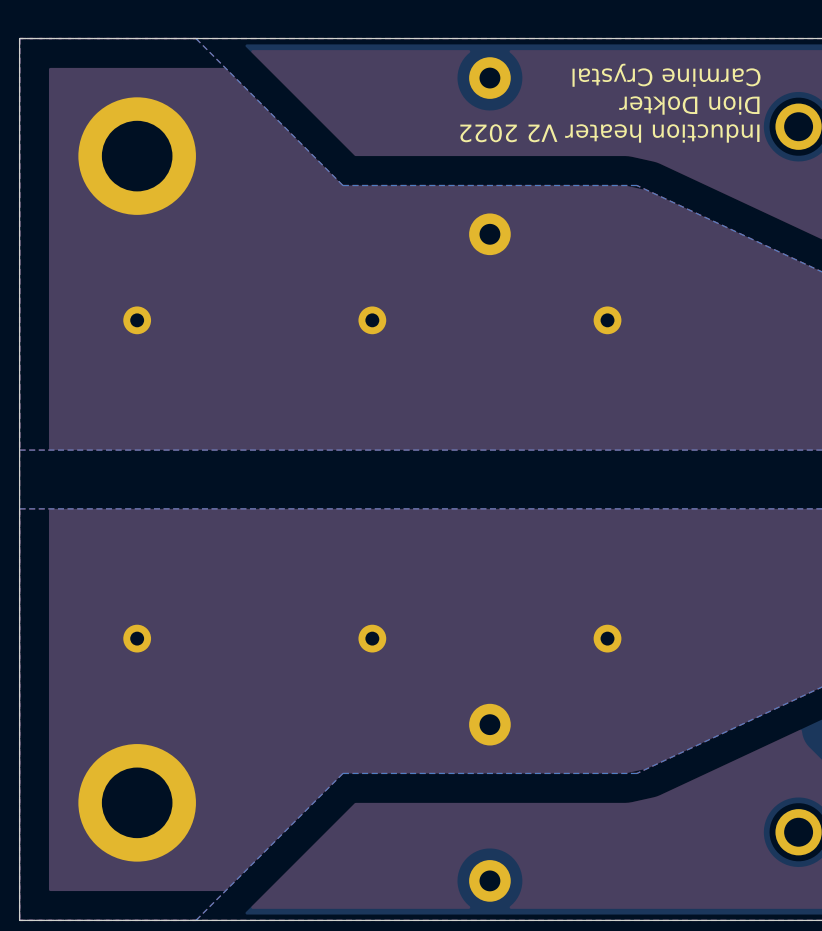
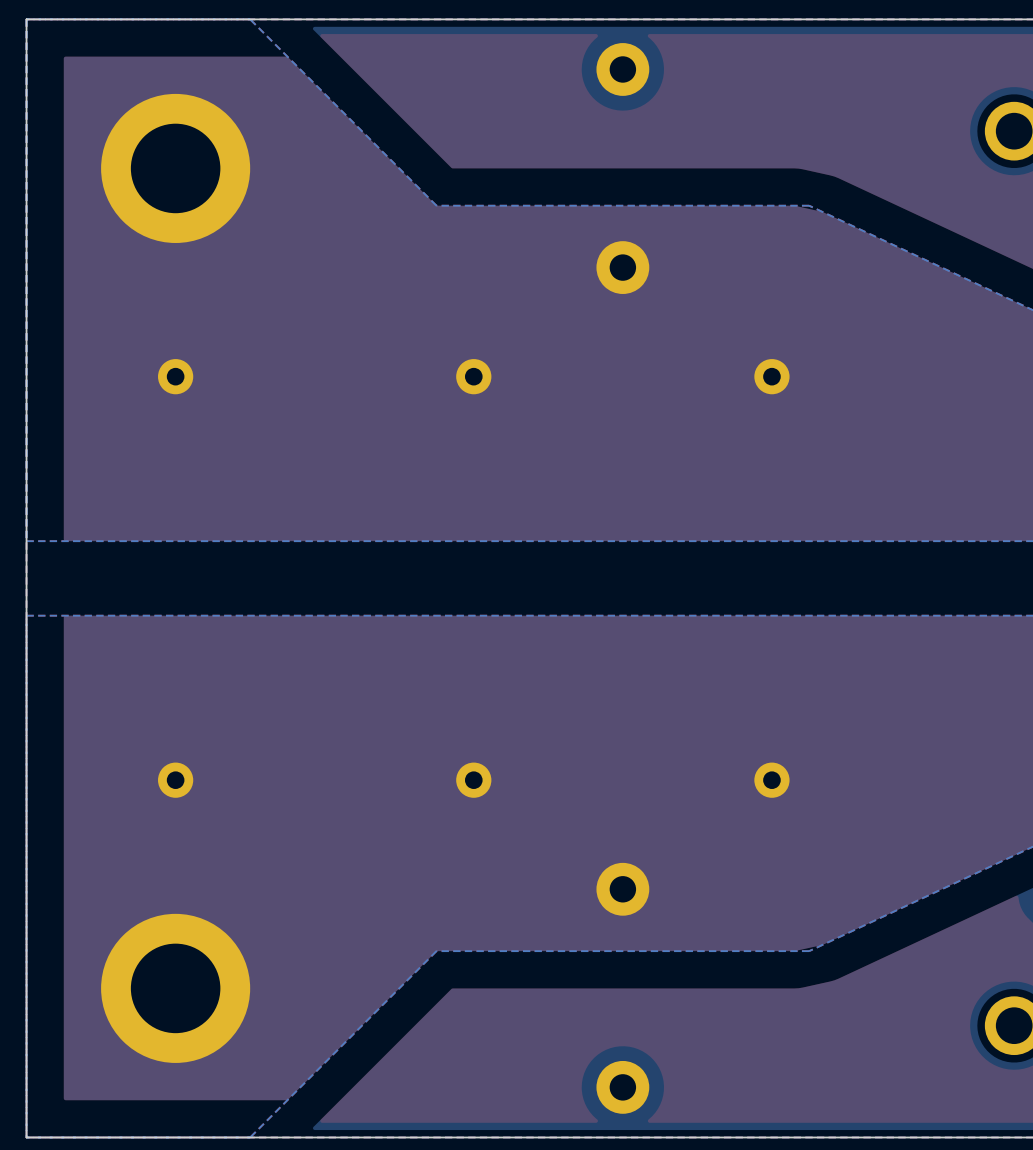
text: Carmine Crystal (666, 75) -> none
text: Dion Dokter (689, 105) -> none
text: Induction heater V2 2022 (609, 133) -> none

